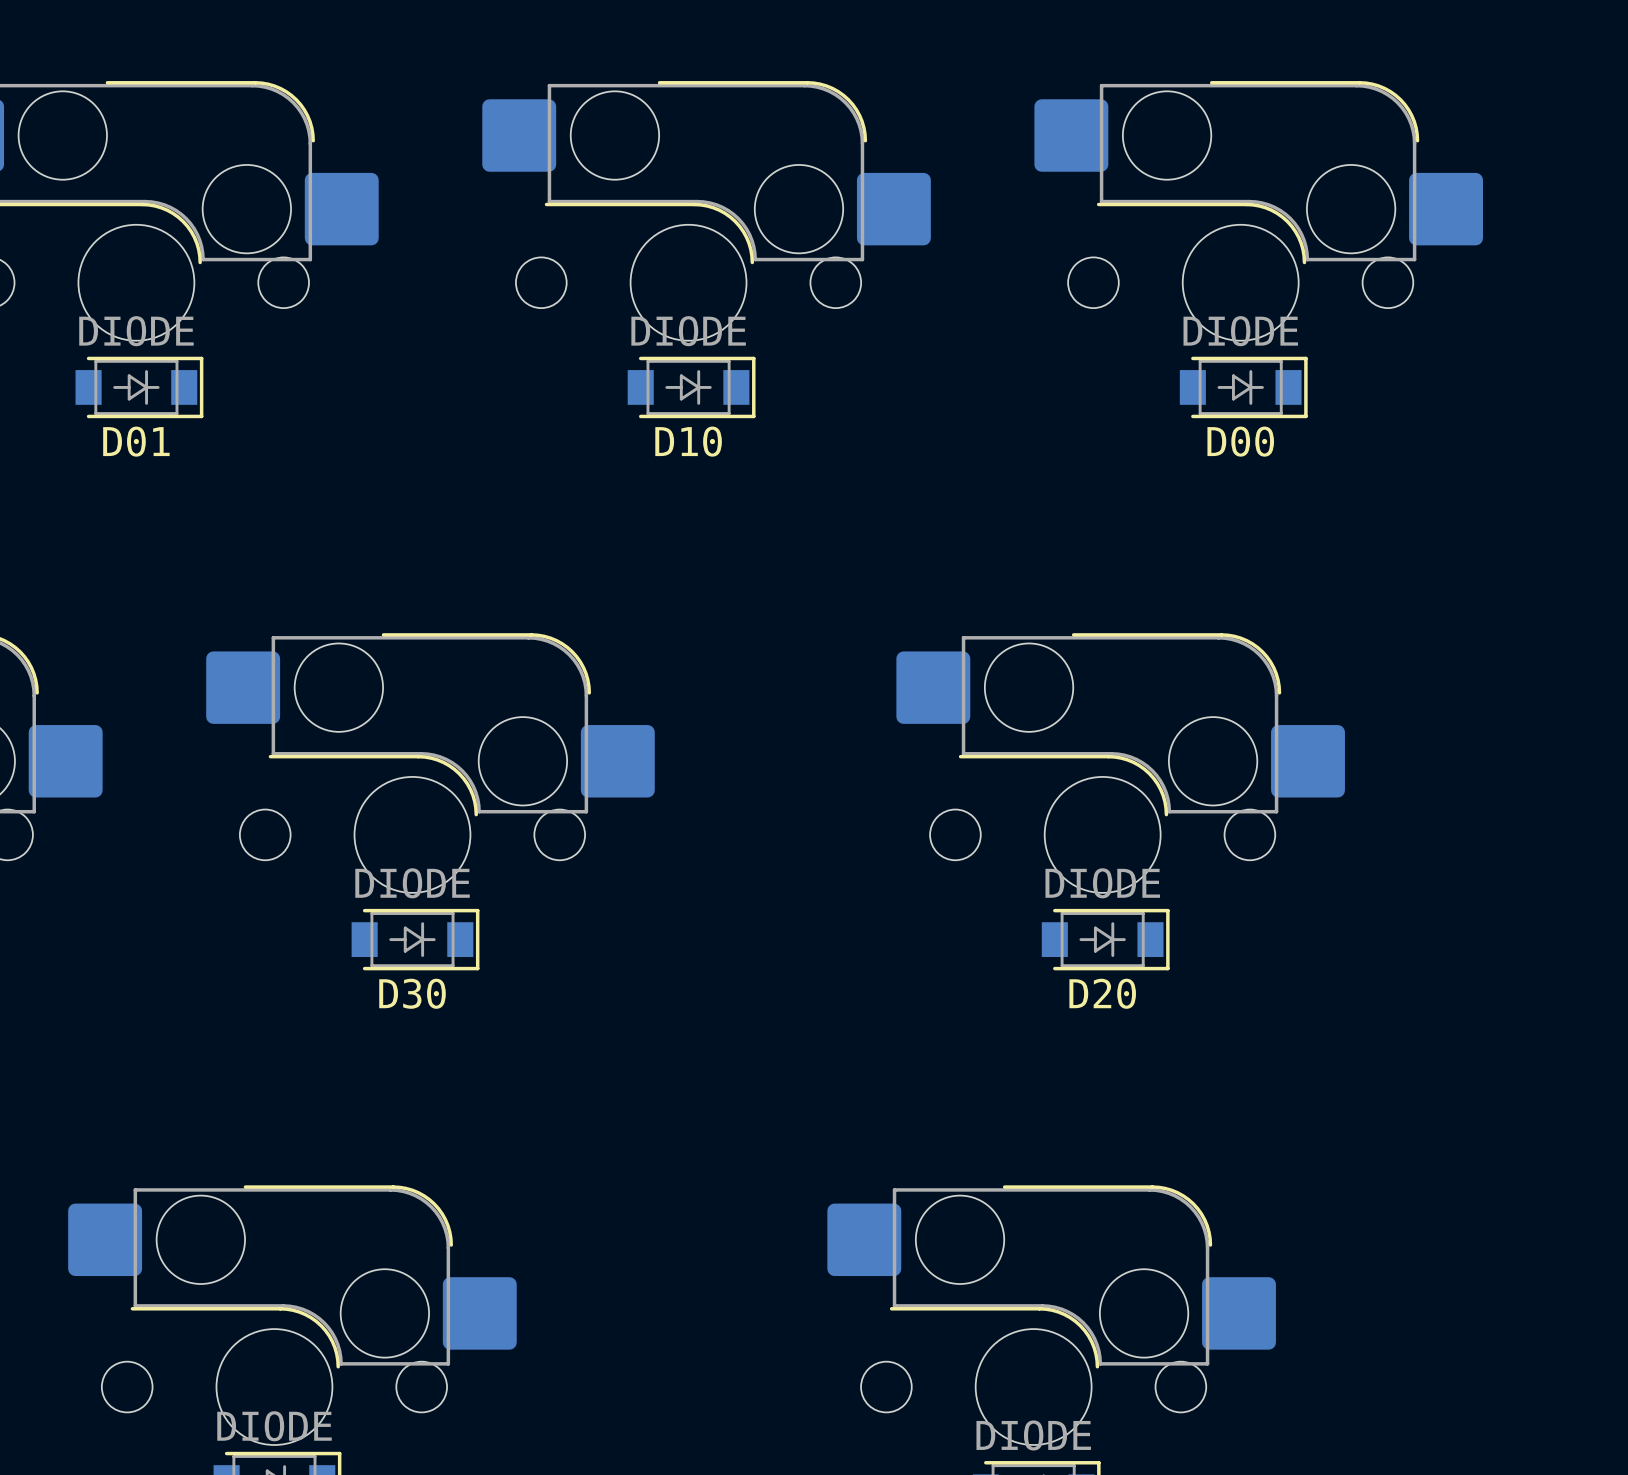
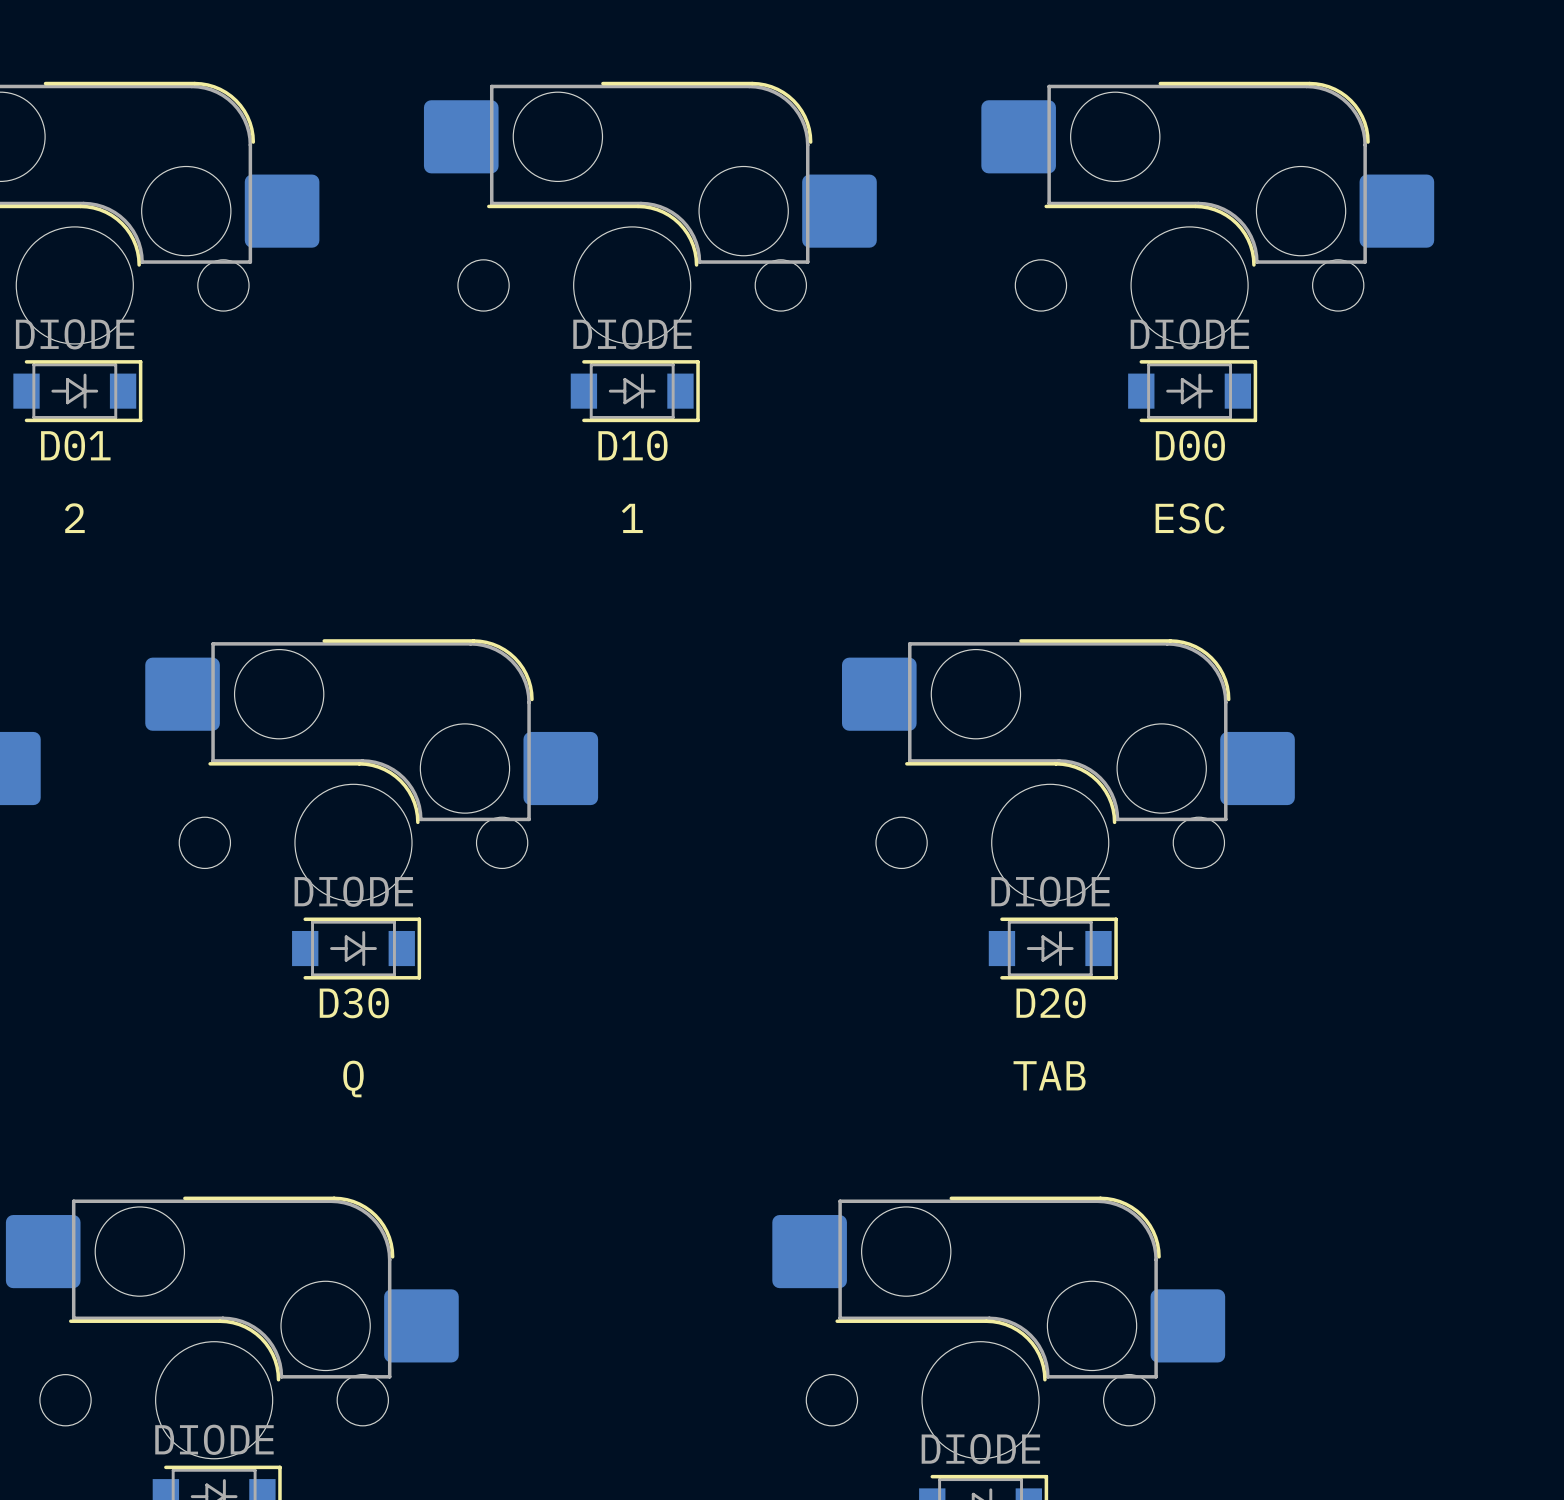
part value: none -> 2 (74, 518)
part value: none -> 1 (632, 518)
part value: none -> ESC (1190, 518)
part value: none -> TAB (1049, 1075)
part value: none -> Q (353, 1079)

